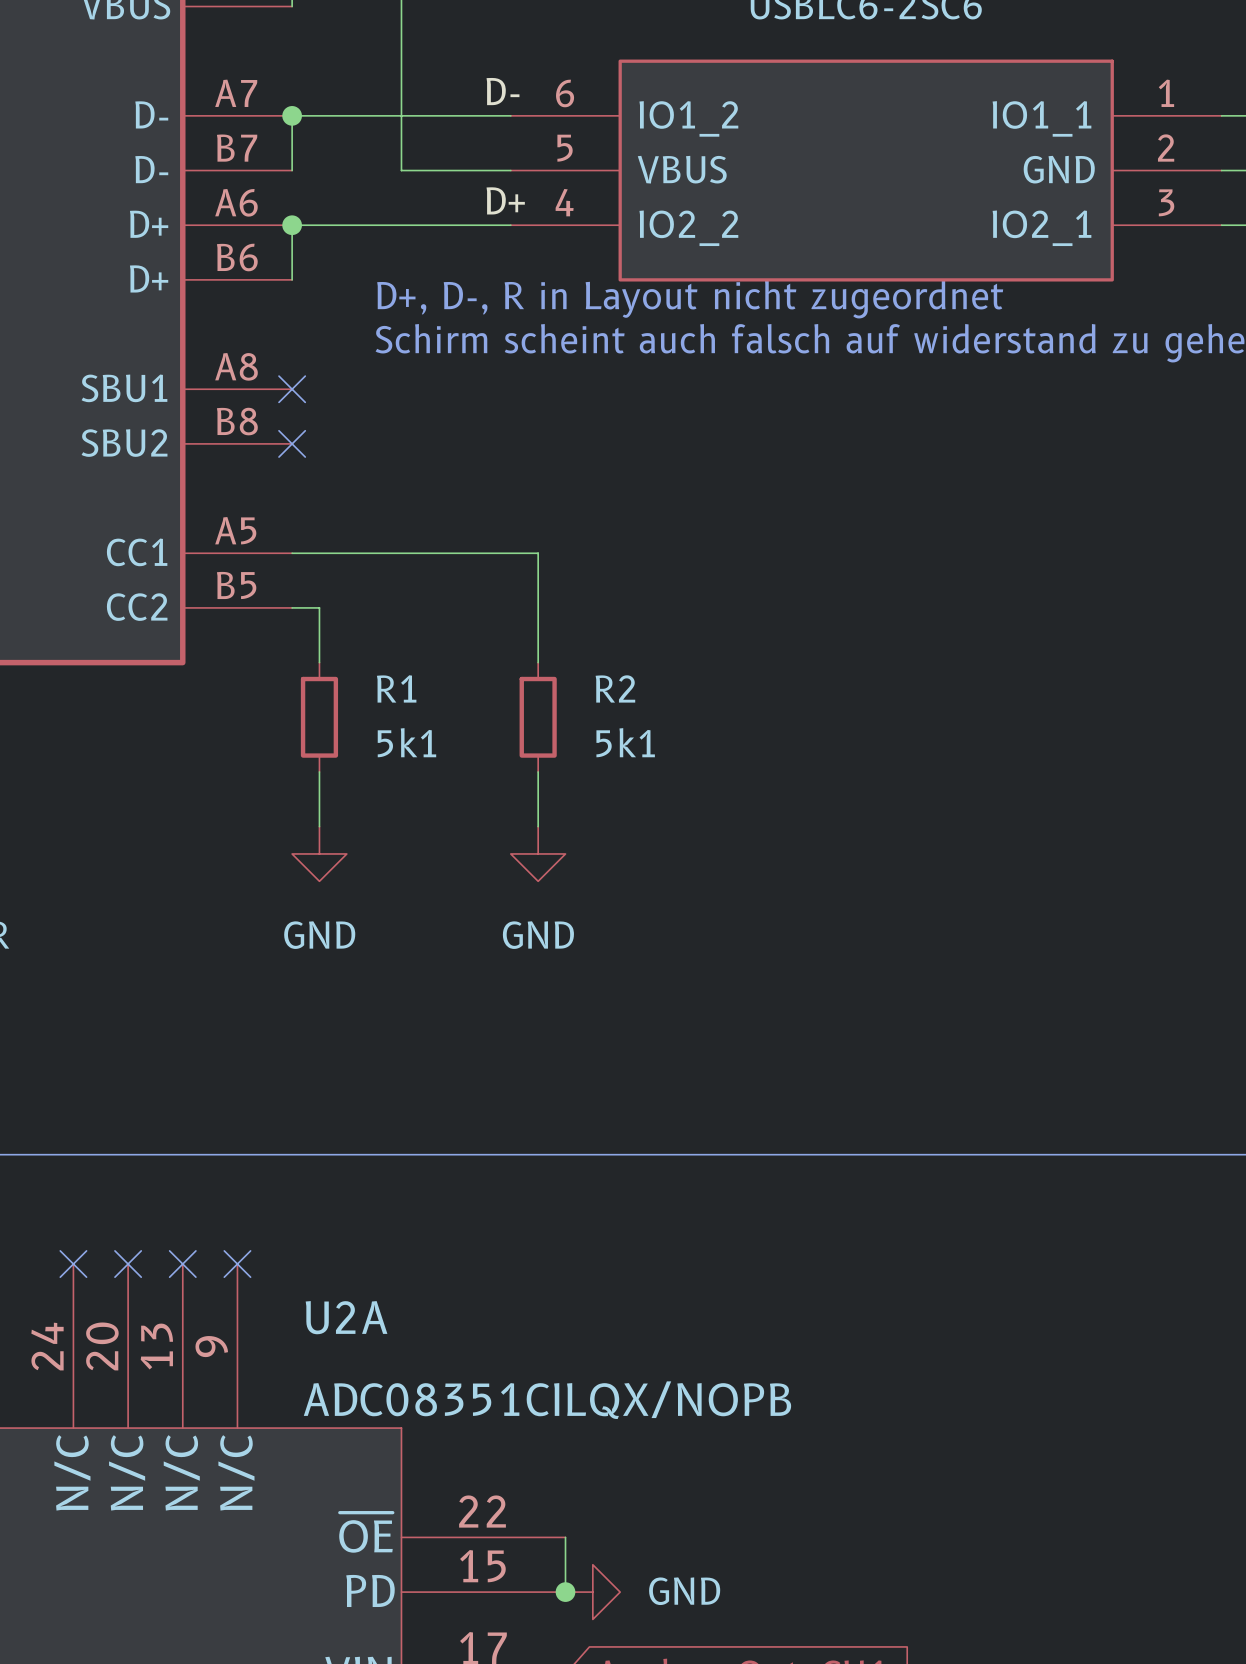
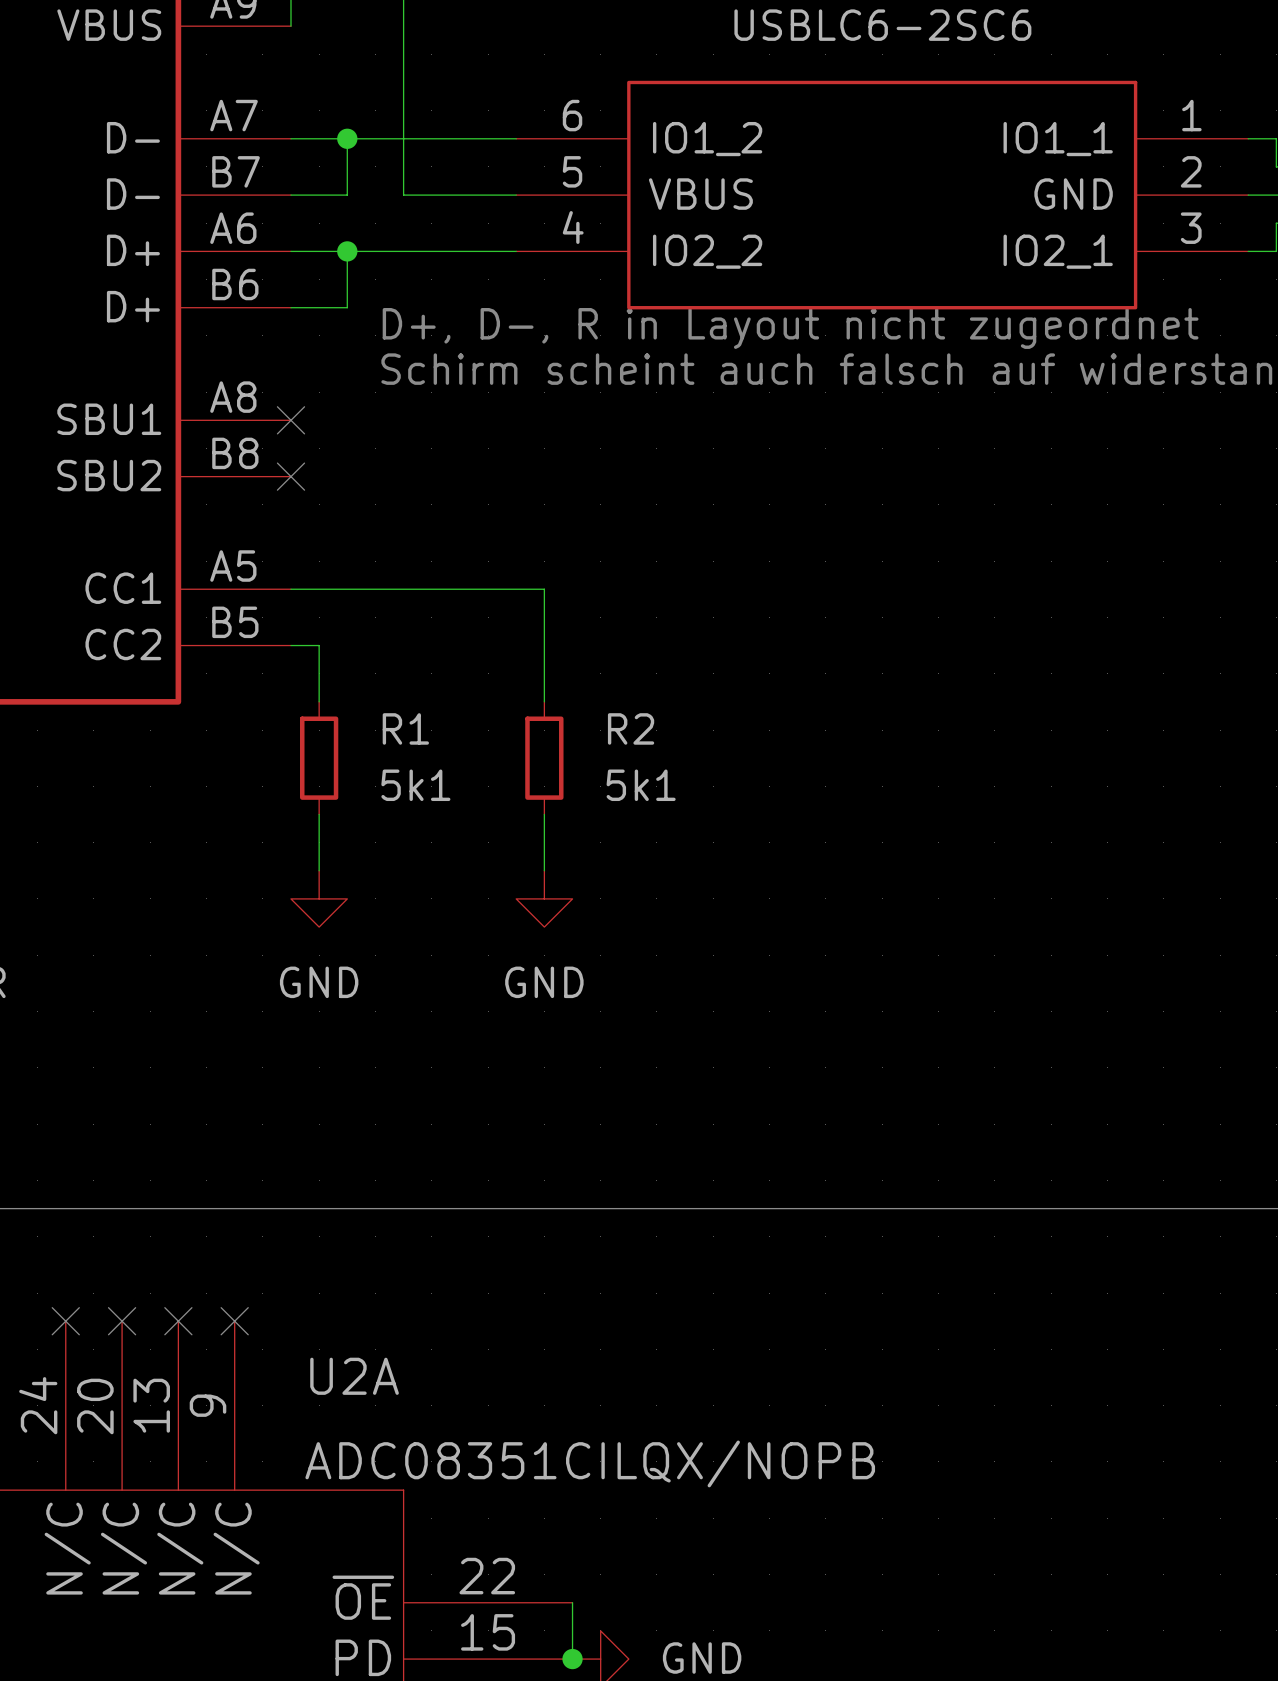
label: D- (503, 91) -> none
wire: (292, 115) (292, 170) -> (347, 138) (347, 195) (290, 195)
junction position: (292, 115) -> (347, 138)
label: D+ (505, 200) -> none
wire: (292, 225) (292, 279) -> (347, 251) (347, 307) (290, 307)
junction position: (292, 225) -> (347, 251)

